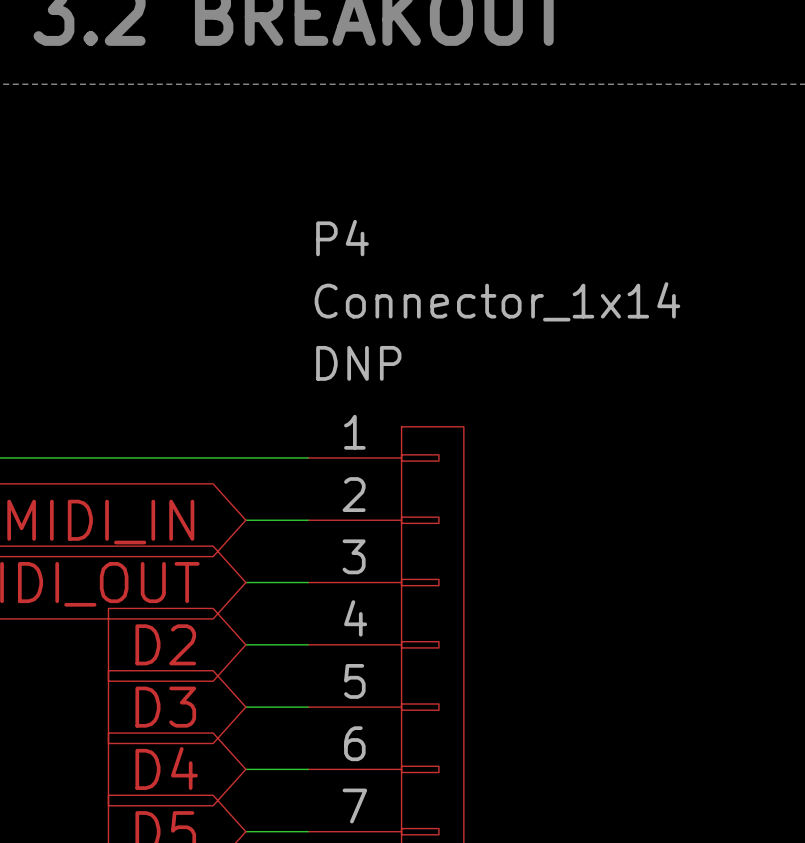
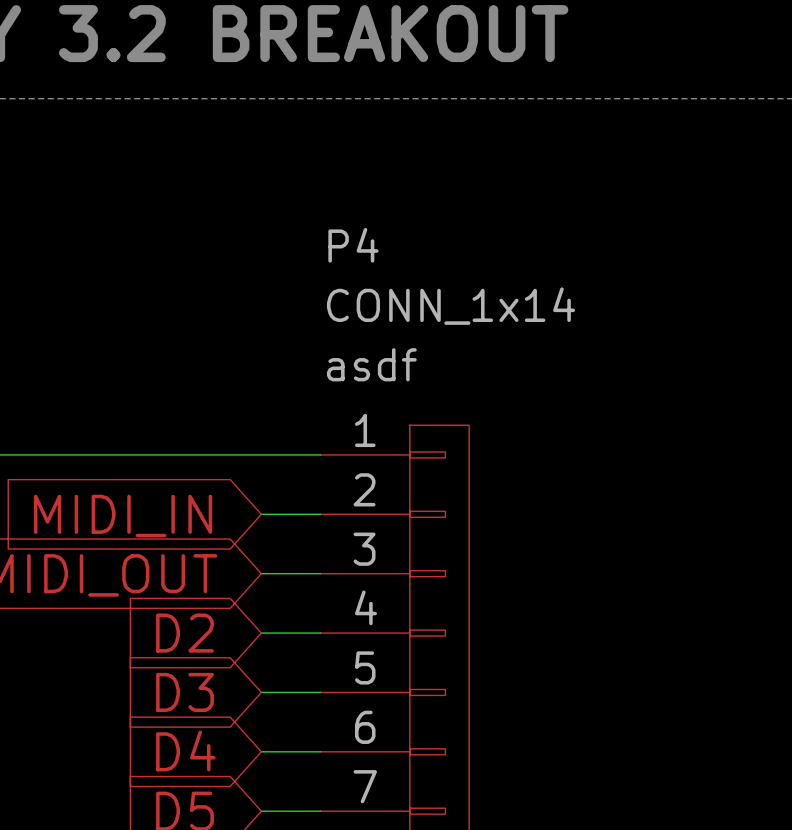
P4 value: Connector_1x14 (497, 301) -> CONN_1x14 (451, 306)
P4 text: DNP (358, 363) -> asdf (371, 364)

